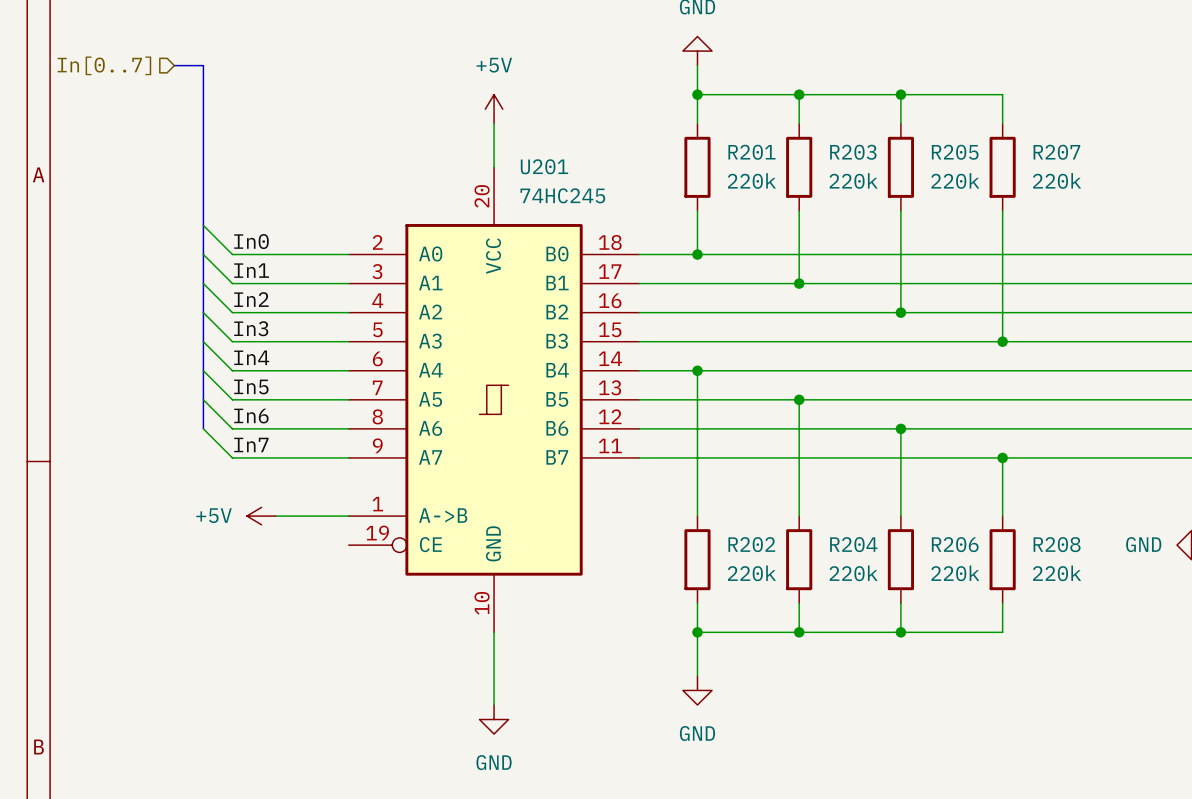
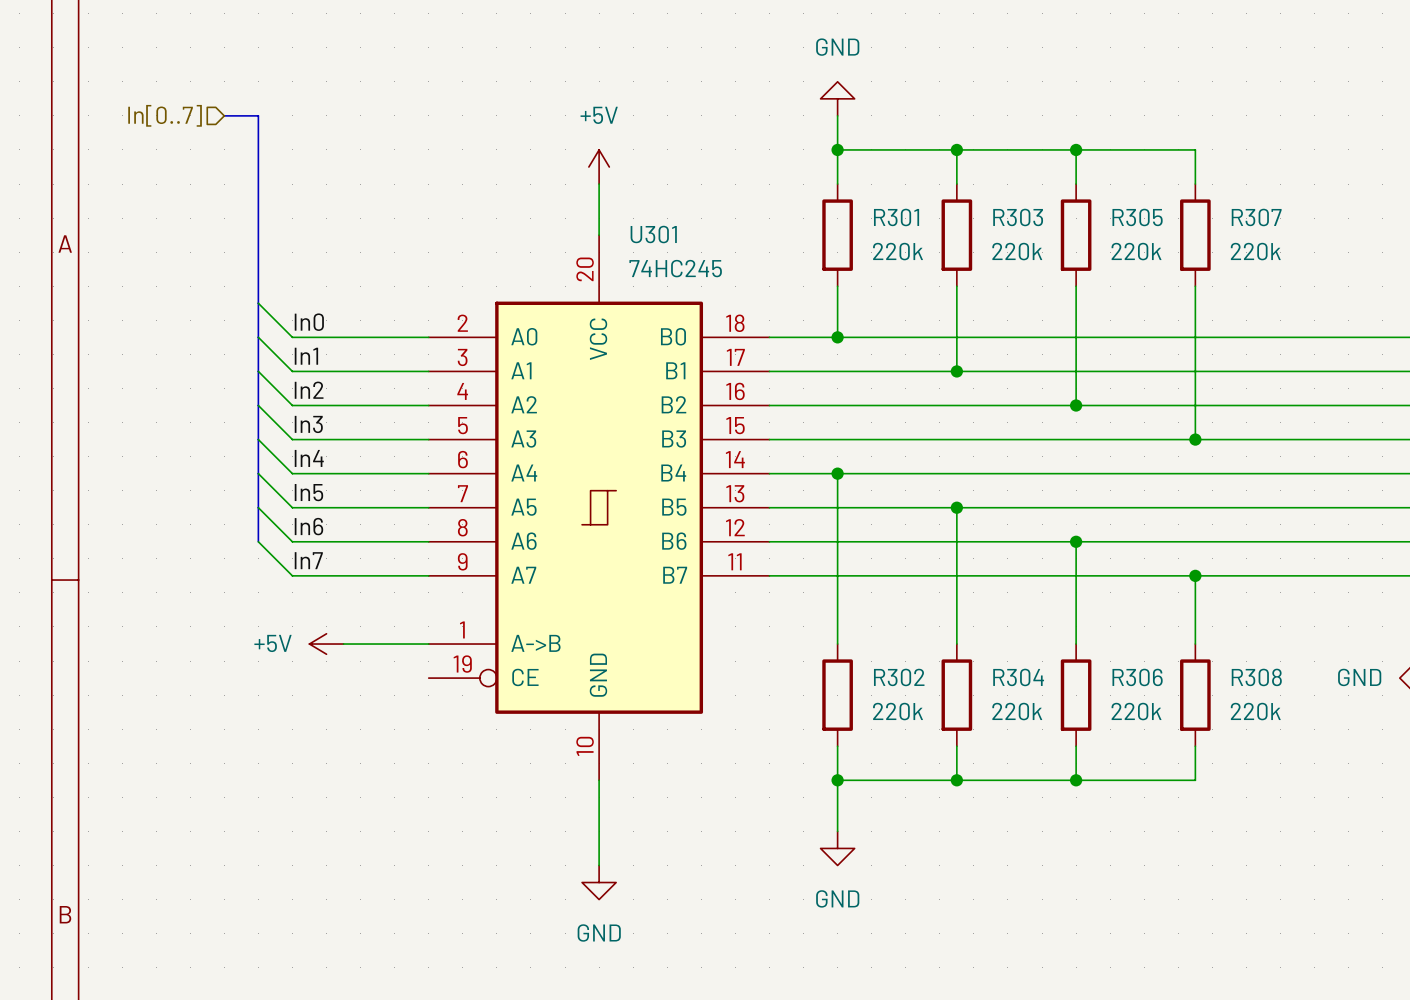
R201 name: R201 (751, 152) -> R301 (896, 217)
R203 name: R203 (853, 152) -> R303 (1018, 217)
R205 name: R205 (955, 152) -> R305 (1137, 217)
R207 name: R207 (1056, 152) -> R307 (1256, 217)
U201 name: U201 (544, 166) -> U301 (653, 234)
R202 name: R202 (751, 544) -> R302 (899, 677)
R204 name: R204 (853, 544) -> R304 (1018, 677)
R206 name: R206 (955, 544) -> R306 (1137, 677)
R208 name: R208 (1057, 544) -> R308 (1256, 677)

